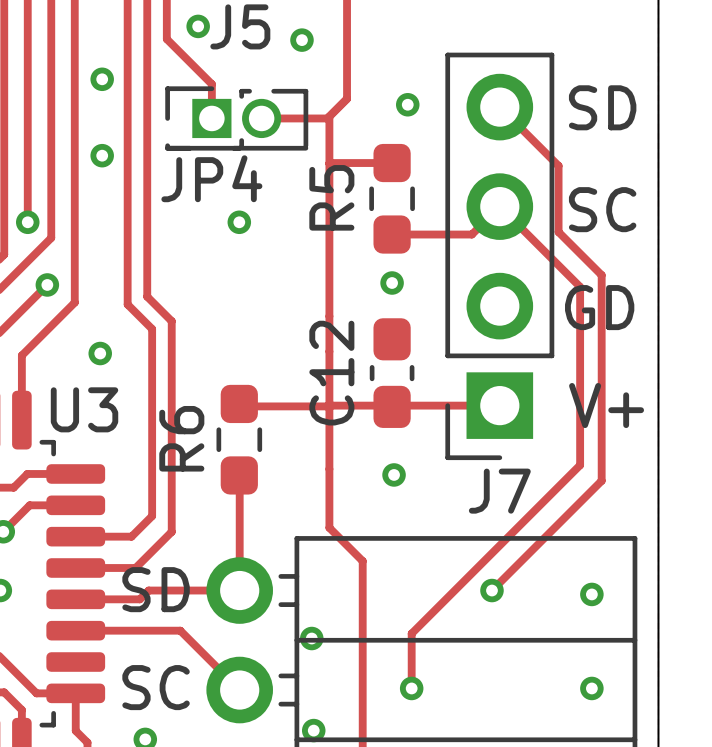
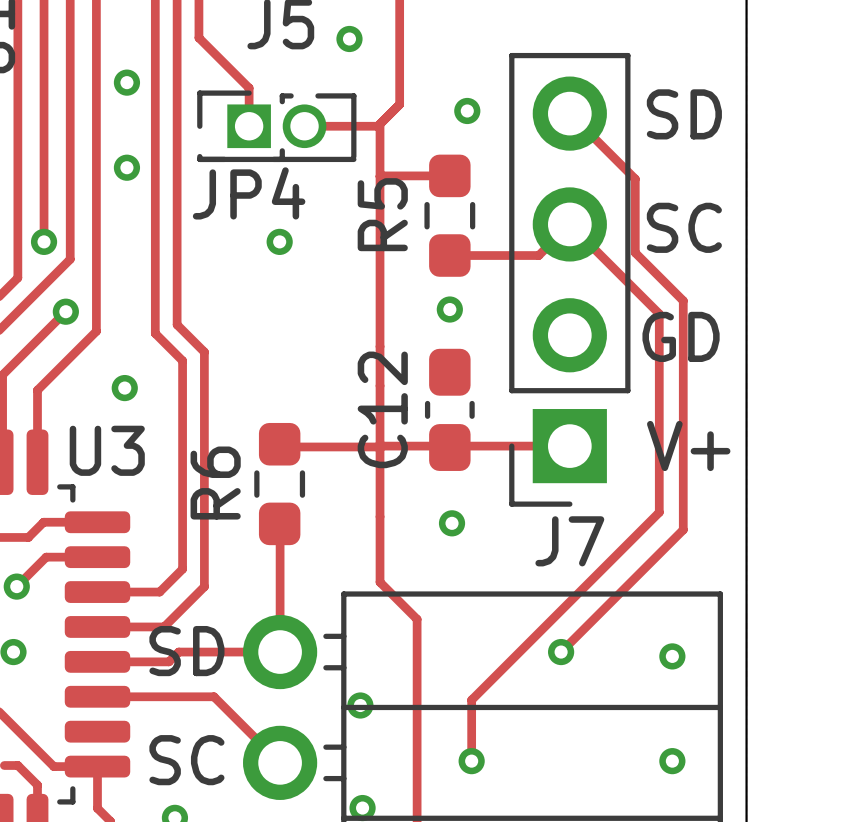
via: (198, 26) -> none

